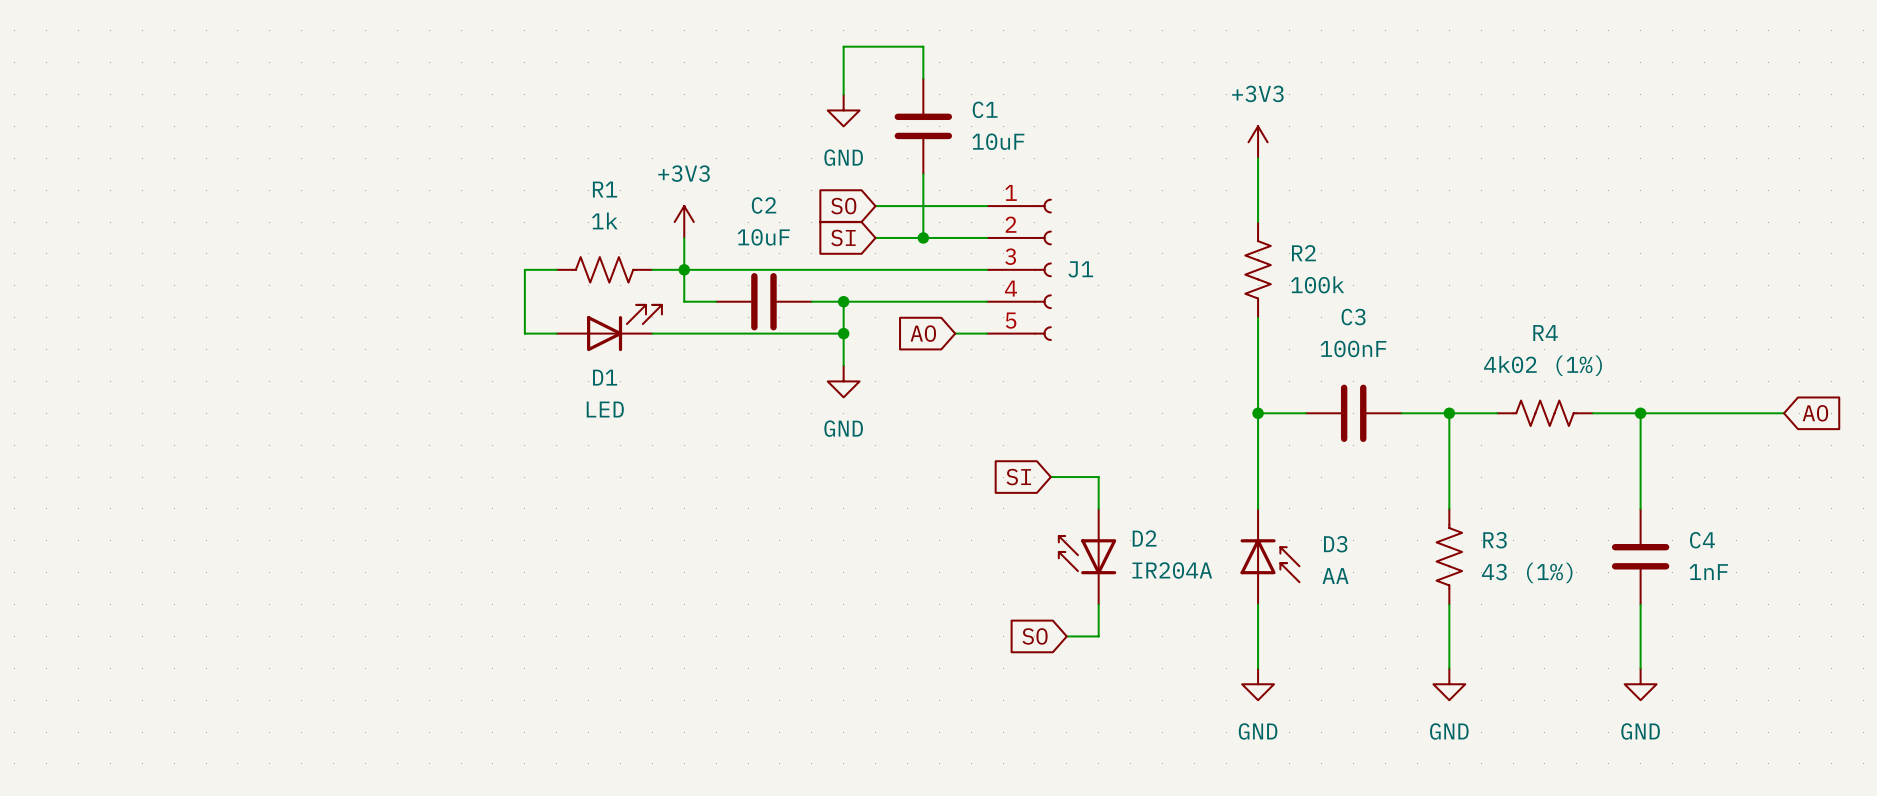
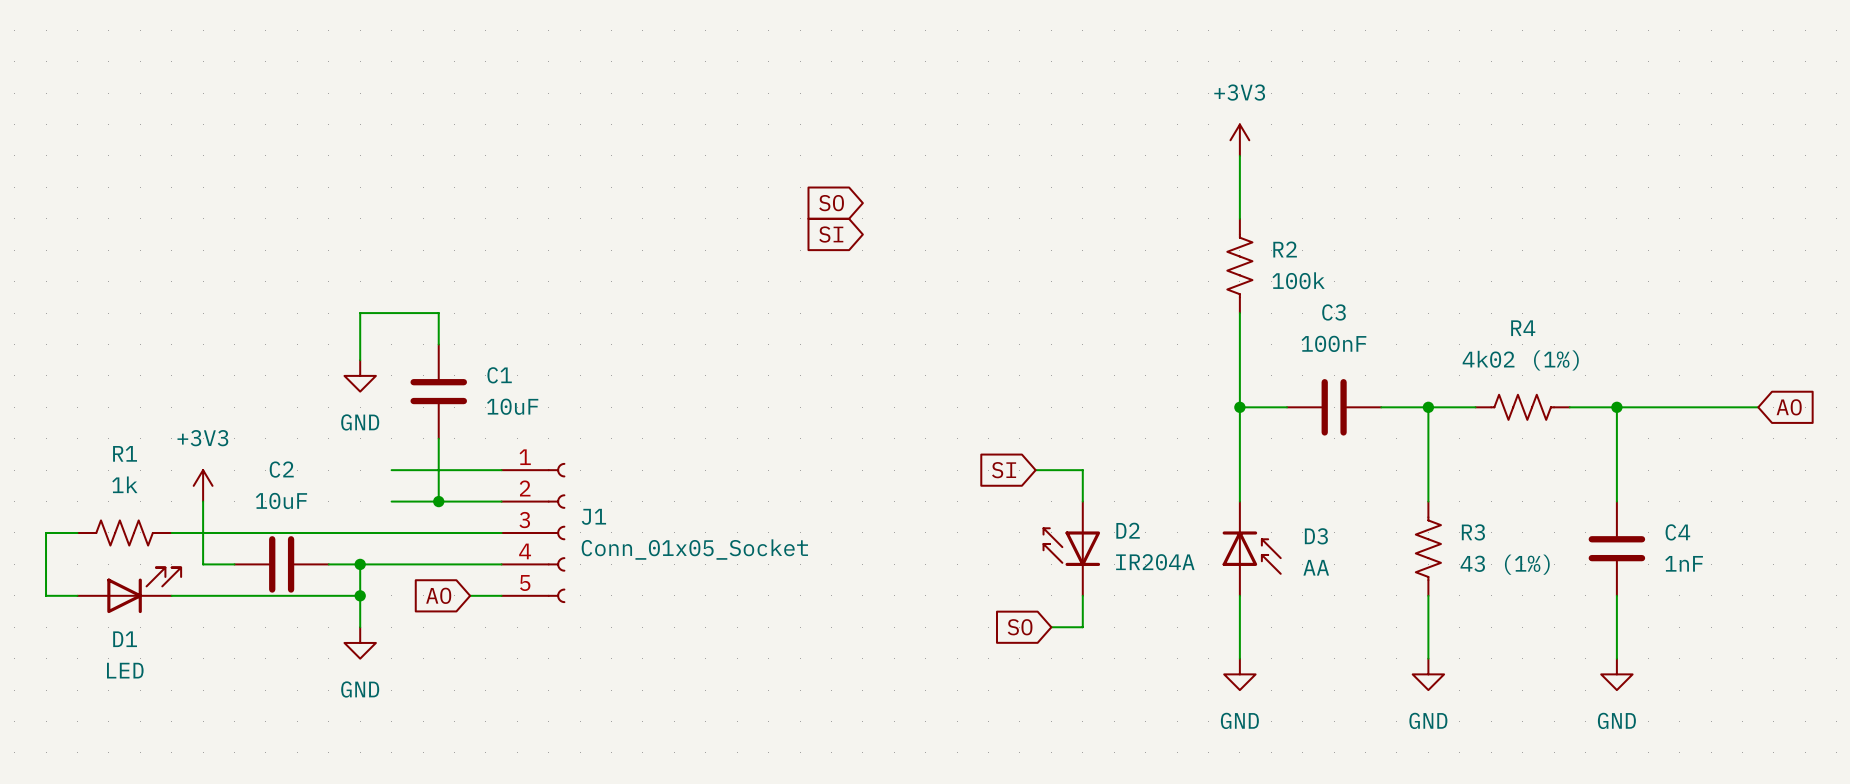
wire: (923, 78) (923, 46) (843, 46) (843, 94) -> none
power symbol: GND (843, 110) -> none
C1 position: (923, 126) -> (438, 391)
wire: (923, 174) (923, 237) -> none
wire: (875, 206) (987, 206) -> none
power symbol: +3V3 (684, 222) -> none
wire: (684, 237) (684, 301) (716, 301) -> none
wire: (875, 237) (987, 237) -> none
junction: (923, 237) -> none
wire: (556, 269) (524, 269) (524, 333) (556, 333) -> none
R1 position: (604, 269) -> (124, 532)
wire: (652, 269) (987, 269) -> none
junction: (684, 269) -> none
J1 position: (1019, 269) -> (533, 532)
J1 name position: J1 (1080, 269) -> J1 (593, 516)
C2 position: (763, 301) -> (281, 564)
wire: (811, 301) (987, 301) -> none
wire: (843, 301) (843, 365) -> none
junction: (843, 301) -> none
D1 position: (609, 328) -> (129, 590)
wire: (652, 333) (843, 333) -> none
junction: (843, 333) -> none
global label: AO (923, 333) -> none
wire: (955, 333) (987, 333) -> none
wire: none -> (438, 344) (438, 313) (360, 313) (360, 360)
power symbol: none -> GND (360, 375)
power symbol: GND (843, 381) -> none
wire: none -> (438, 438) (438, 501)
wire: none -> (391, 470) (501, 470)
power symbol: none -> +3V3 (203, 485)
wire: none -> (203, 501) (203, 564) (234, 564)
wire: none -> (391, 501) (501, 501)
junction: none -> (438, 501)
wire: none -> (77, 532) (46, 532) (46, 595) (77, 595)
wire: none -> (171, 532) (501, 532)
J1 value: none -> Conn_01x05_Socket (694, 549)
wire: none -> (328, 564) (501, 564)
wire: none -> (360, 564) (360, 627)
junction: none -> (360, 564)
wire: none -> (171, 595) (360, 595)
junction: none -> (360, 595)
global label: none -> AO (438, 595)
wire: none -> (470, 595) (501, 595)
power symbol: none -> GND (360, 642)

